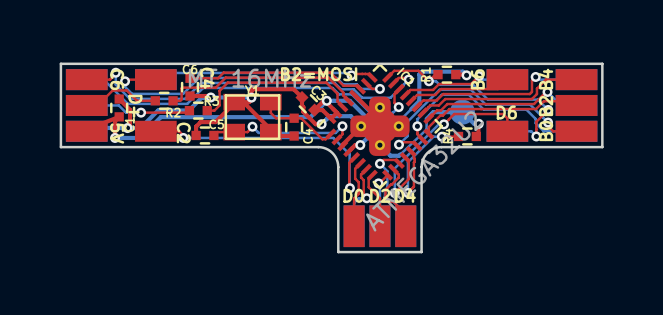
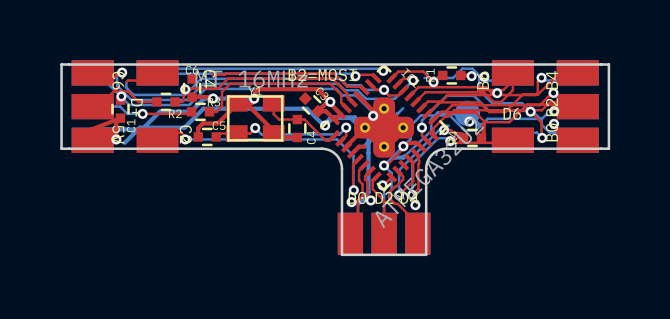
bottom track: none -> (170, 68) (381, 68) (383, 70)
via: none -> (383, 70)
via: none -> (122, 72)
part: none -> (92, 72)
via: (115, 72) -> none
part: none -> (157, 72)
part: none -> (512, 72)
part: none -> (577, 72)
top track: (222, 73) (218, 78) (190, 78) -> (224, 74) (212, 74)
bottom track: (466, 75) (462, 71) (422, 71) (419, 74) (419, 101) (402, 117) (394, 117) (389, 123) (372, 123) (349, 100) (326, 100) (310, 117) (160, 117) (140, 137) (115, 137) -> none
top track: (479, 76) (471, 84) (439, 84) (433, 89) (410, 89) -> (497, 93) (491, 93) (485, 87) (418, 87) (414, 90)
bottom track: none -> (424, 77) (453, 77) (462, 68) (472, 68) (479, 75) (479, 90) (492, 103) (522, 103) (530, 111)
part: (86, 79) -> none
part: (155, 79) -> none
part: (507, 79) -> none
top track: (576, 79) (545, 79) (536, 88) (536, 94) (531, 99) (476, 99) -> none
part: (576, 79) -> none
via: (125, 81) -> none
bottom track: (428, 81) (435, 81) (439, 84) (473, 84) (487, 99) (537, 99) (548, 109) -> none
via: none -> (185, 89)
top track: (472, 89) (441, 89) (435, 94) (417, 94) -> (512, 72) (512, 90) (501, 101) (493, 101) (483, 92) (425, 92) (421, 96)
via: none -> (497, 93)
top track: (394, 94) (394, 102) (398, 107) -> (398, 95) (388, 95) (384, 90)
via: none -> (121, 96)
top track: (119, 99) (130, 109) (130, 125) (127, 128) -> none
top track: (251, 99) (252, 89) (293, 89) (302, 97) (303, 111) (315, 124) (321, 124) -> (254, 100) (255, 91) (257, 89) (317, 89) (327, 99)
top track: (476, 99) (445, 99) (438, 105) (430, 105) -> (577, 72) (559, 72) (538, 94) (523, 94) (505, 112) (489, 112) (479, 102) (439, 102) (434, 106)
part: (86, 105) -> none
part: none -> (92, 106)
top track: none -> (577, 106) (576, 105) (527, 104) (509, 122) (485, 122) (475, 112) (449, 112)
part: none -> (577, 106)
part: (576, 105) -> none
via: (398, 107) -> none
top track: (548, 109) (536, 121) (536, 136) -> none
top track: none -> (530, 111) (541, 122) (541, 140)
via: none -> (530, 111)
via: none -> (373, 115)
part footprint: [135, 120, 177, 142] -> [136, 127, 179, 153]
via: none -> (469, 121)
bottom track: (548, 122) (530, 104) (485, 104) (470, 89) (439, 89) (407, 121) (406, 137) -> (546, 114) (541, 118) (487, 118) (475, 130) (464, 130) (449, 115) (421, 115) (410, 125) (410, 139)
via: (478, 123) -> none
top track: (443, 124) (454, 114) (503, 114) (507, 118) (507, 131) -> none
via: (443, 124) -> none
via: (127, 128) -> none
top track: none -> (444, 130) (462, 133)
via: none -> (444, 130)
part: (86, 131) -> none
part: (507, 131) -> none
part: (576, 131) -> none
via: (441, 136) -> none
part: none -> (92, 140)
top track: none -> (512, 140) (510, 142) (451, 142) (450, 141)
part: none -> (512, 140)
part: none -> (577, 140)
via: none -> (450, 141)
bottom track: none -> (124, 142) (139, 127) (184, 127) (203, 108) (307, 108) (323, 125) (330, 117) (350, 117) (368, 135) (368, 192) (358, 202) (351, 202)
via: (360, 145) -> none
top track: (399, 163) (395, 159) (383, 159) (379, 163) -> (418, 143) (410, 141) (386, 165) (384, 165)
via: none -> (351, 202)
via: none -> (415, 205)
part: (354, 226) -> none
part: (379, 226) -> none
part: (405, 226) -> none
part: none -> (350, 233)
part: none -> (384, 233)
part: none -> (417, 233)

